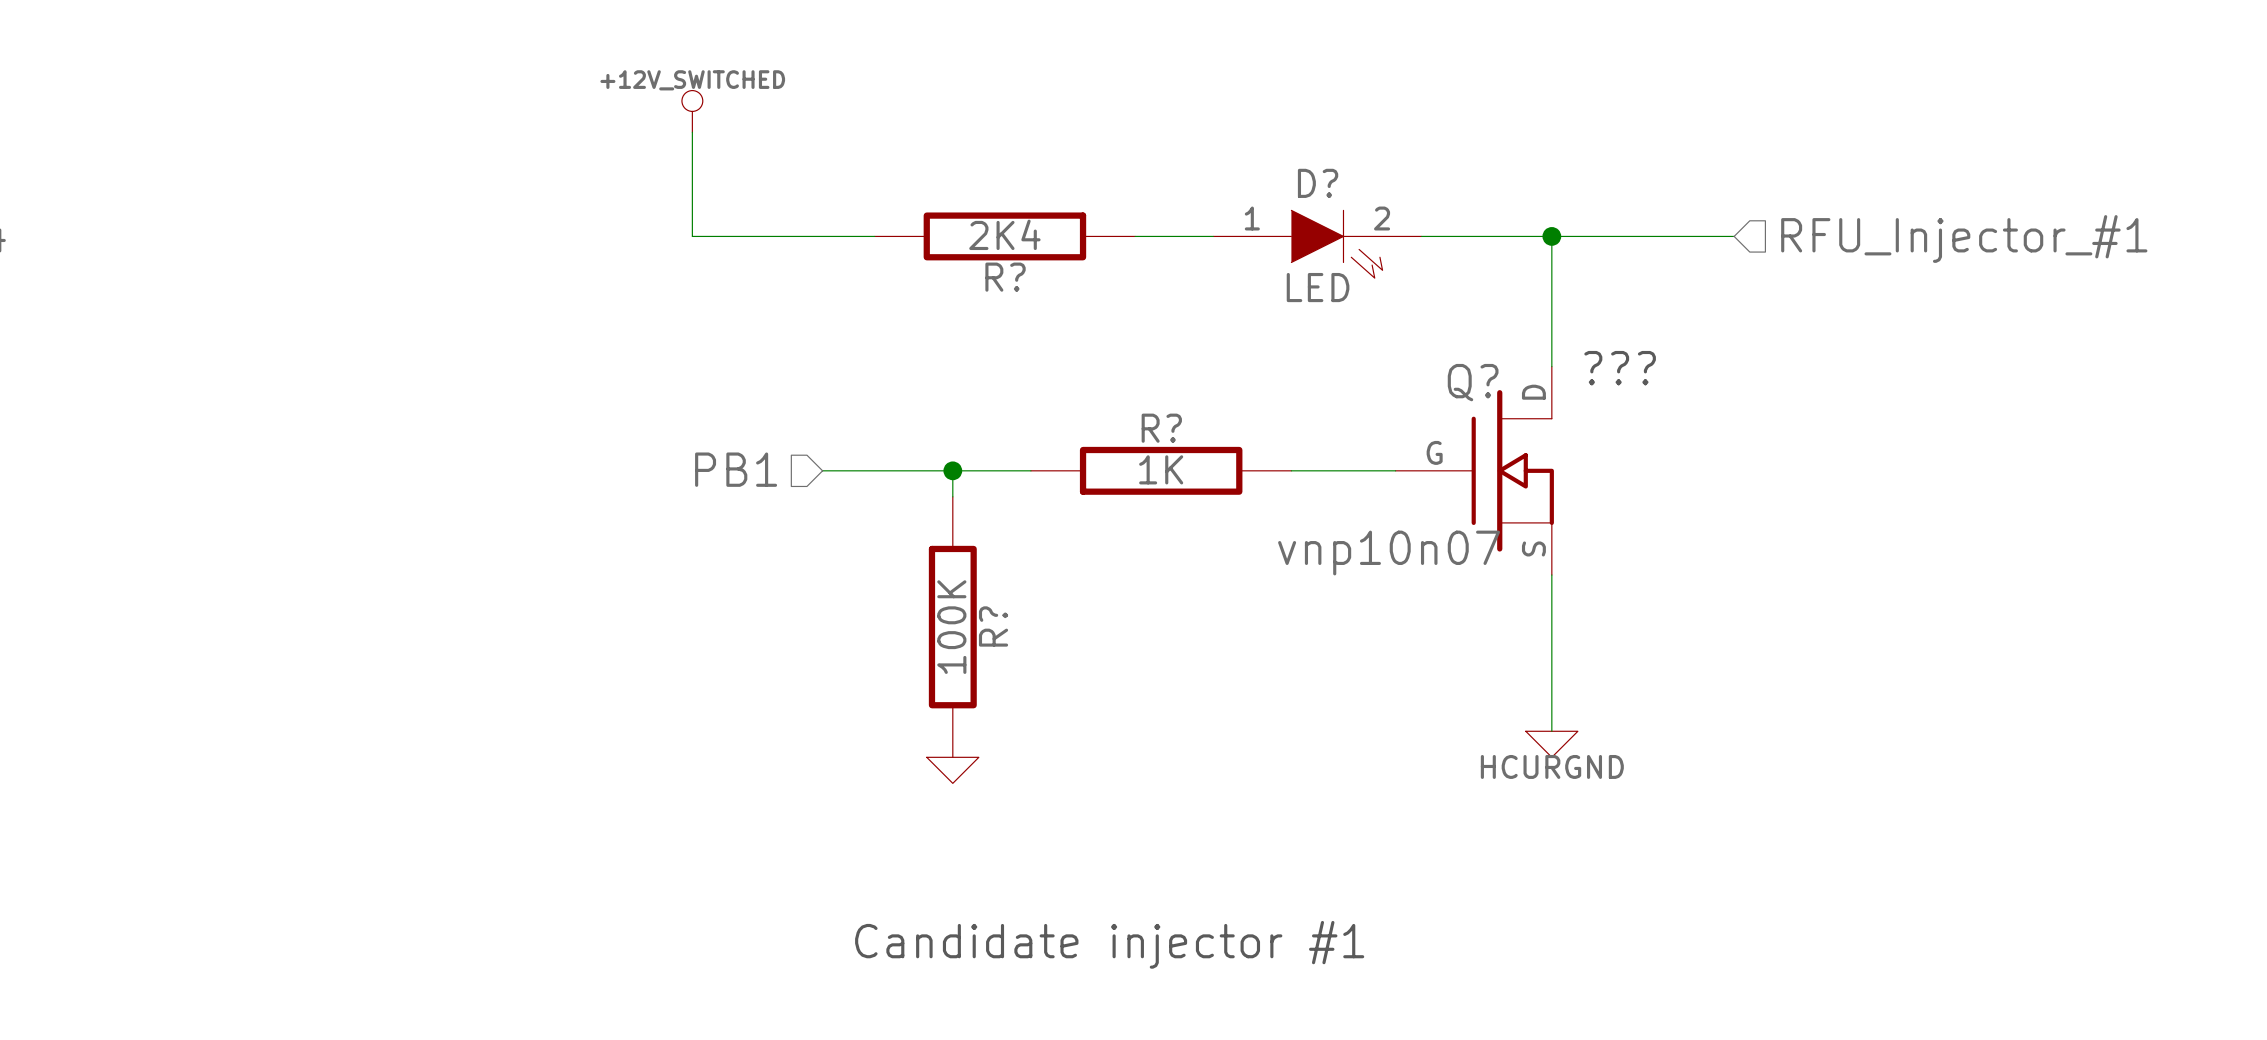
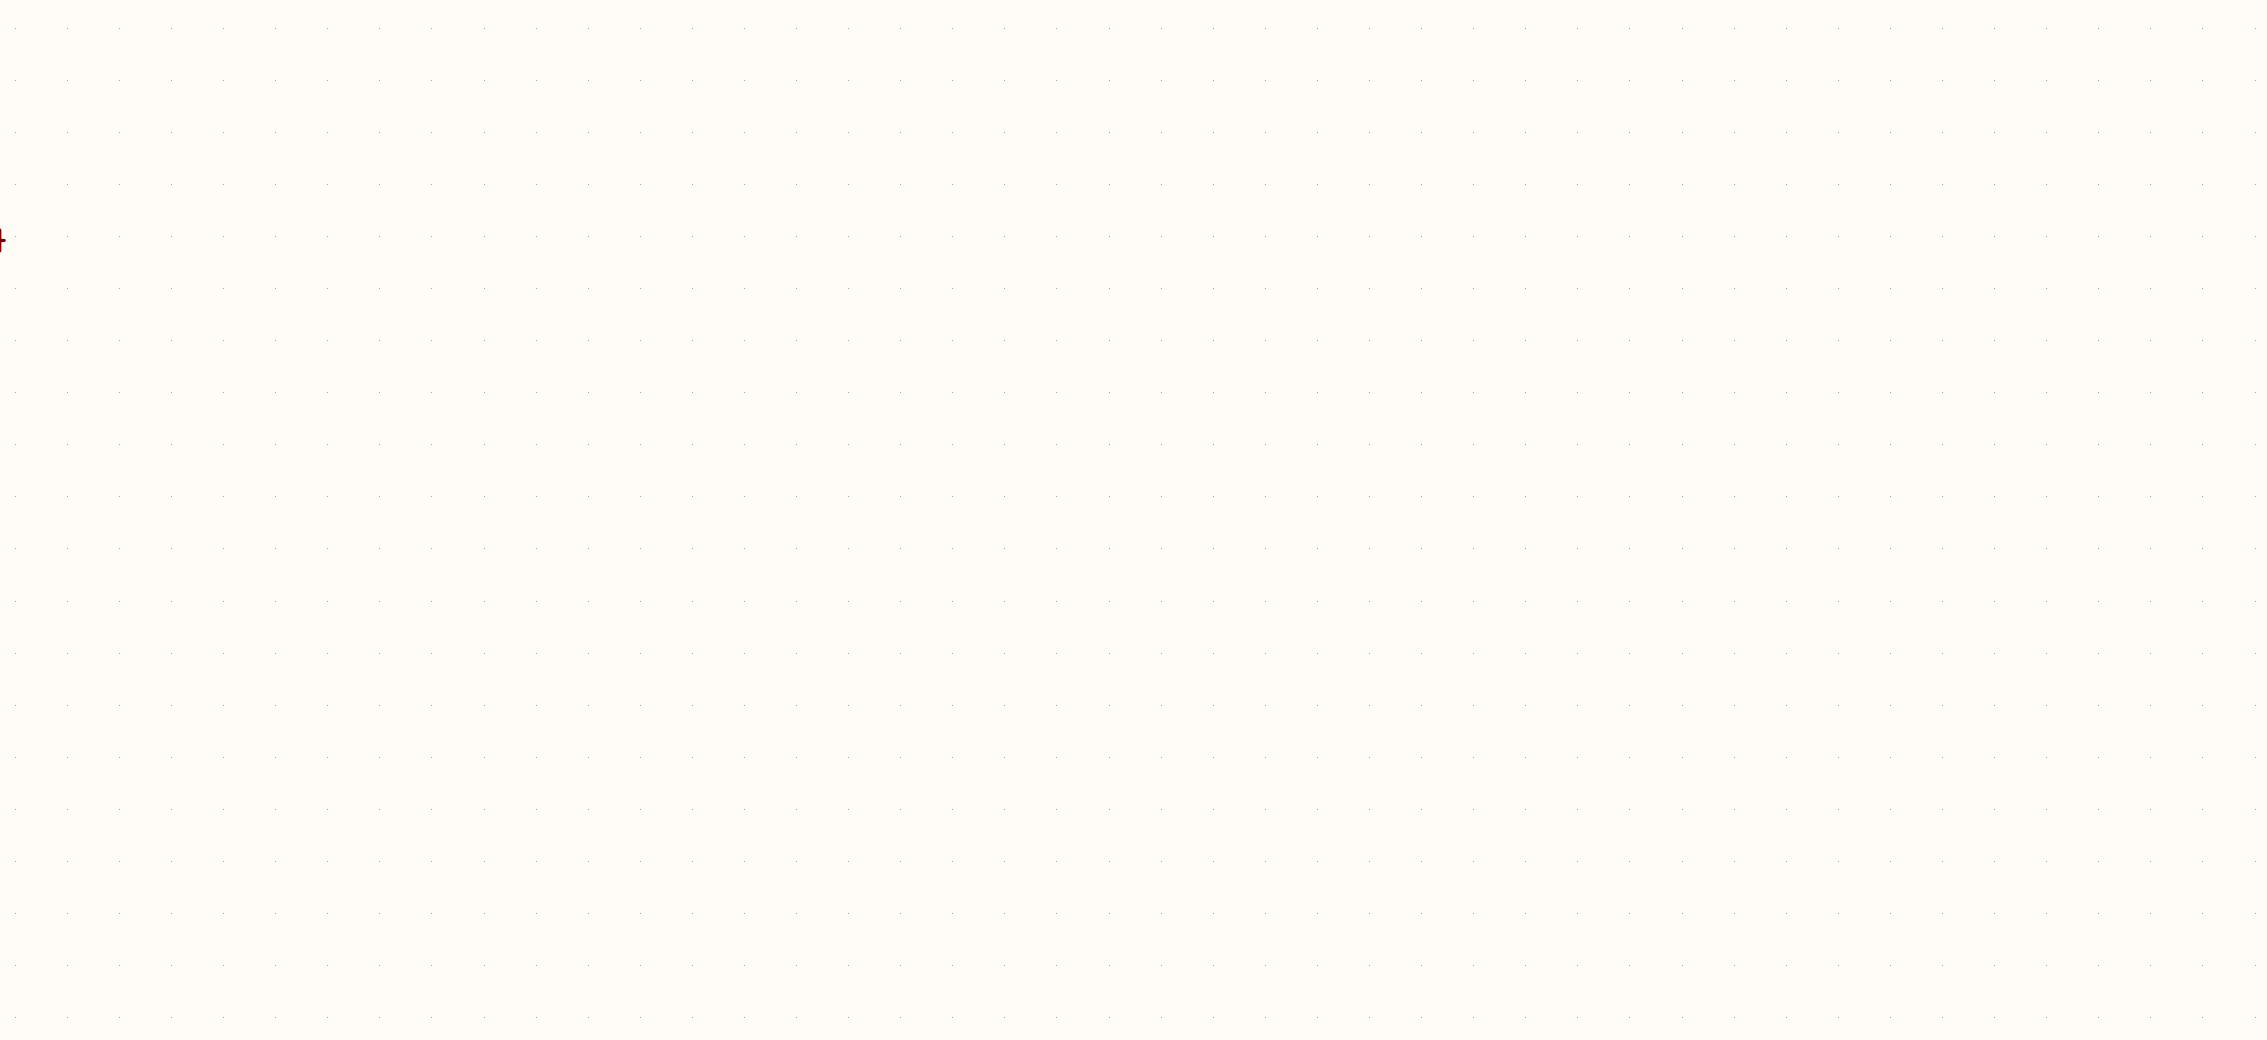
power symbol: +12V_SWITCHED (692, 111) -> none
wire: (692, 132) (692, 236) (874, 236) -> none
R?: 2K4 (1004, 236) -> none
wire: (1135, 236) (1213, 236) -> none
wire: (1421, 236) (1734, 236) -> none
wire: (1551, 236) (1551, 366) -> none
junction: (1551, 236) -> none
hierarchical label: RFU_Injector_#1 (1964, 238) -> none
D?: LED (1317, 244) -> none
text: ??? (1620, 368) -> none
hierarchical label: PB1 (736, 469) -> none
wire: (822, 470) (1030, 470) -> none
wire: (952, 470) (952, 496) -> none
junction: (952, 470) -> none
R?: 1K (1161, 470) -> none
wire: (1291, 470) (1395, 470) -> none
Q?: vnp10n07 (1474, 470) -> none
wire: (1551, 575) (1551, 731) -> none
R?: 100K (952, 627) -> none
power symbol: HCURGND (1551, 744) -> none
power symbol: (952, 770) -> none
text: Candidate injector #1 (1109, 944) -> none

